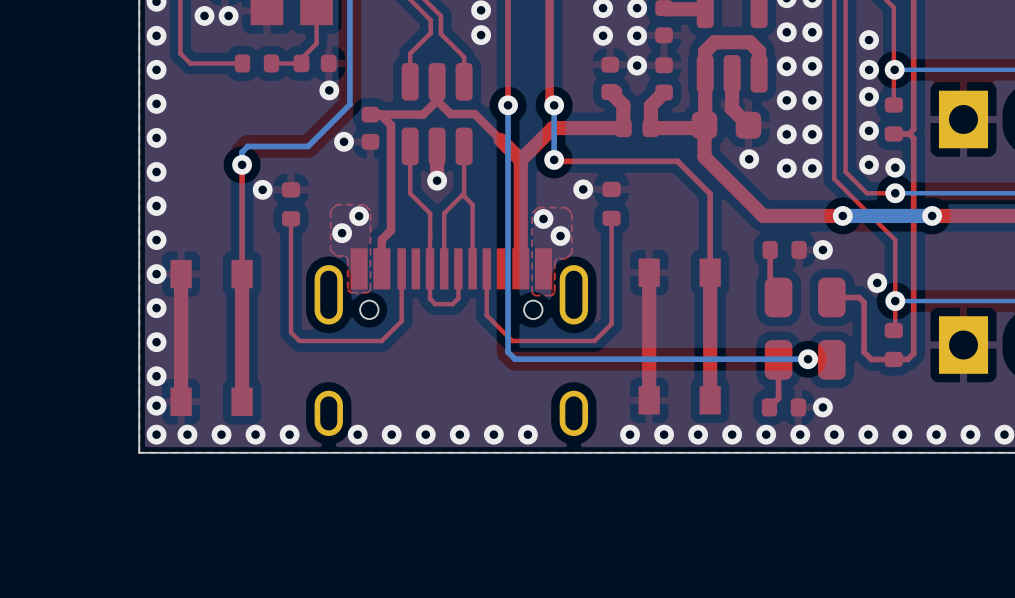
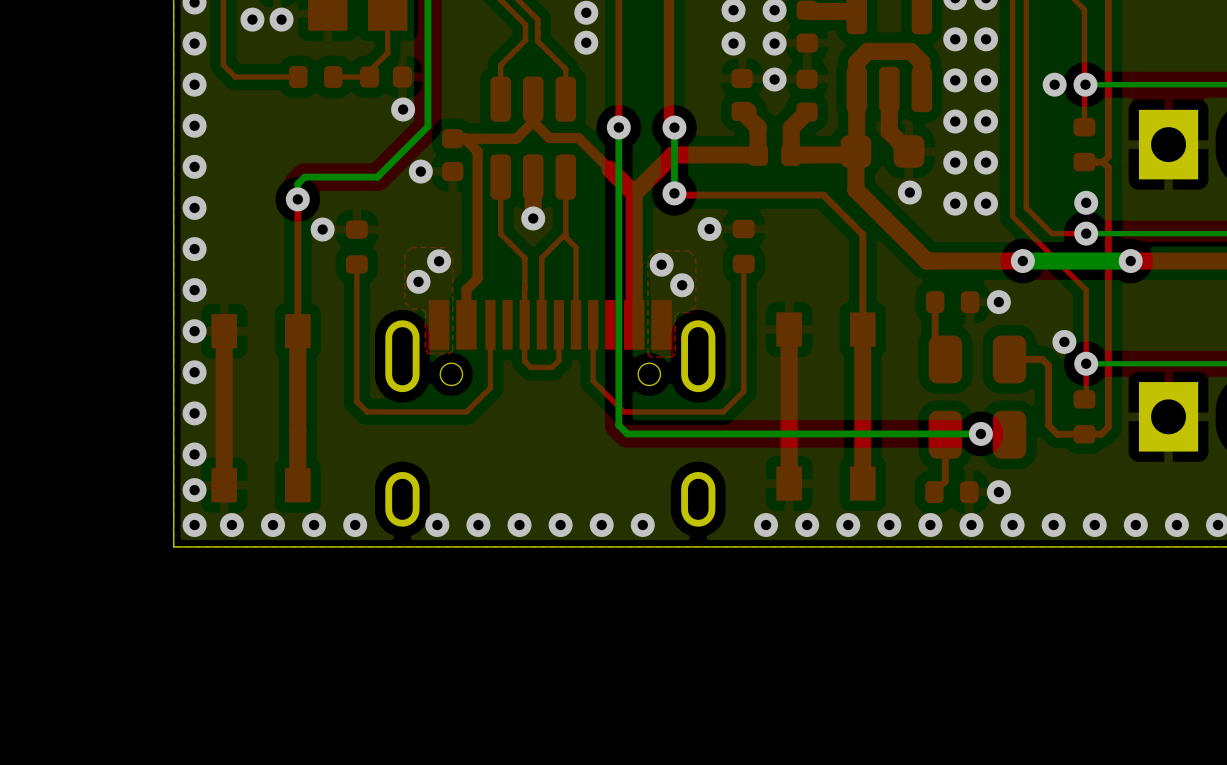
via: (869, 40) -> none
via: (869, 96) -> none
via: (869, 130) -> none
via: (869, 164) -> none

